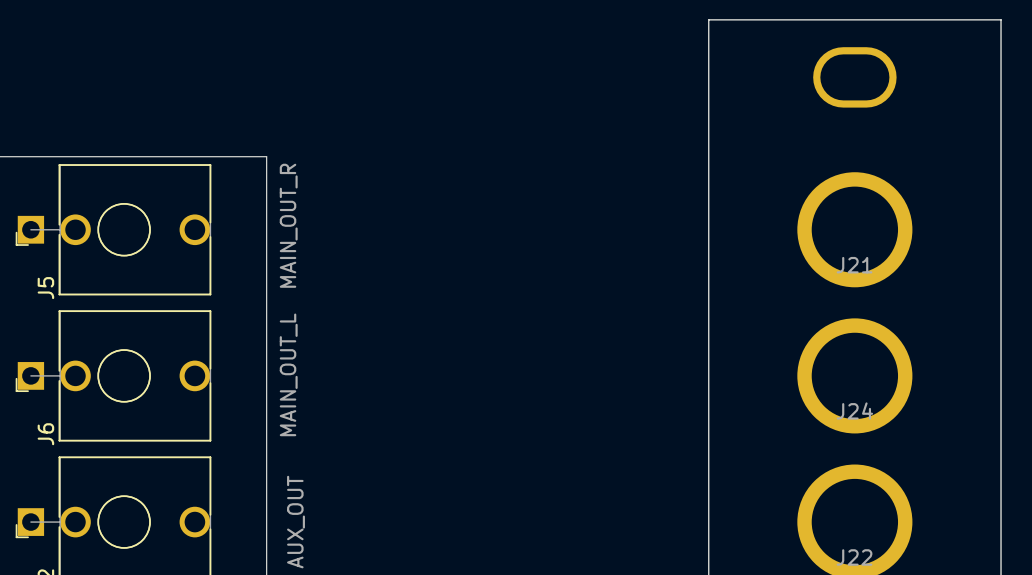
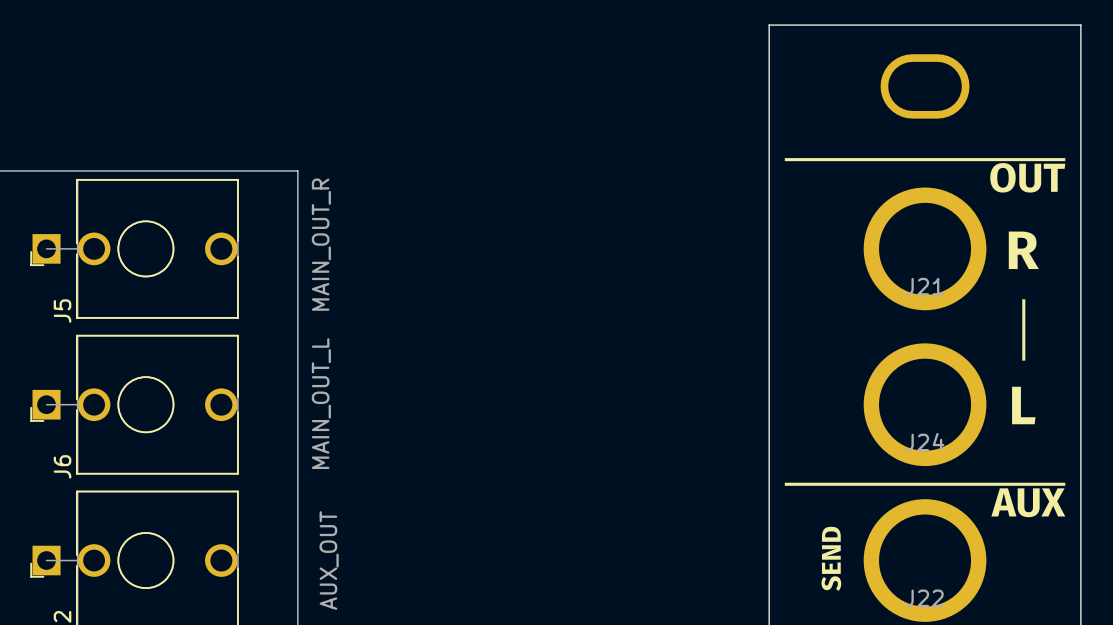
drawing: none -> [784, 158, 1066, 193]
drawing: none -> [1008, 231, 1039, 270]
drawing: none -> [1022, 299, 1026, 361]
drawing: none -> [1012, 386, 1036, 425]
drawing: none -> [784, 482, 1066, 518]
drawing: none -> [821, 526, 842, 591]

